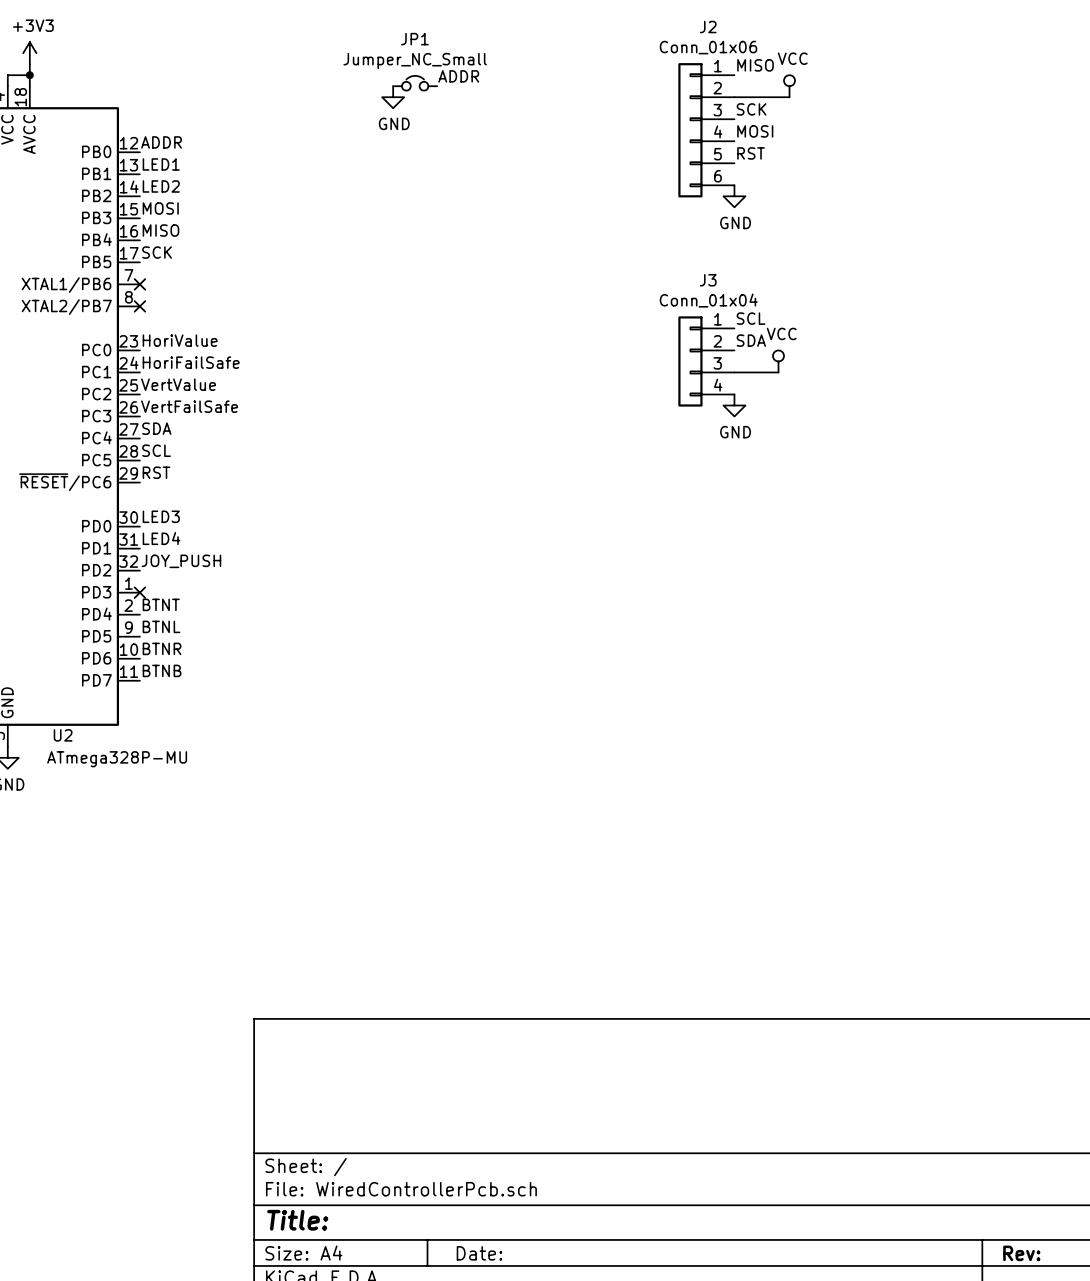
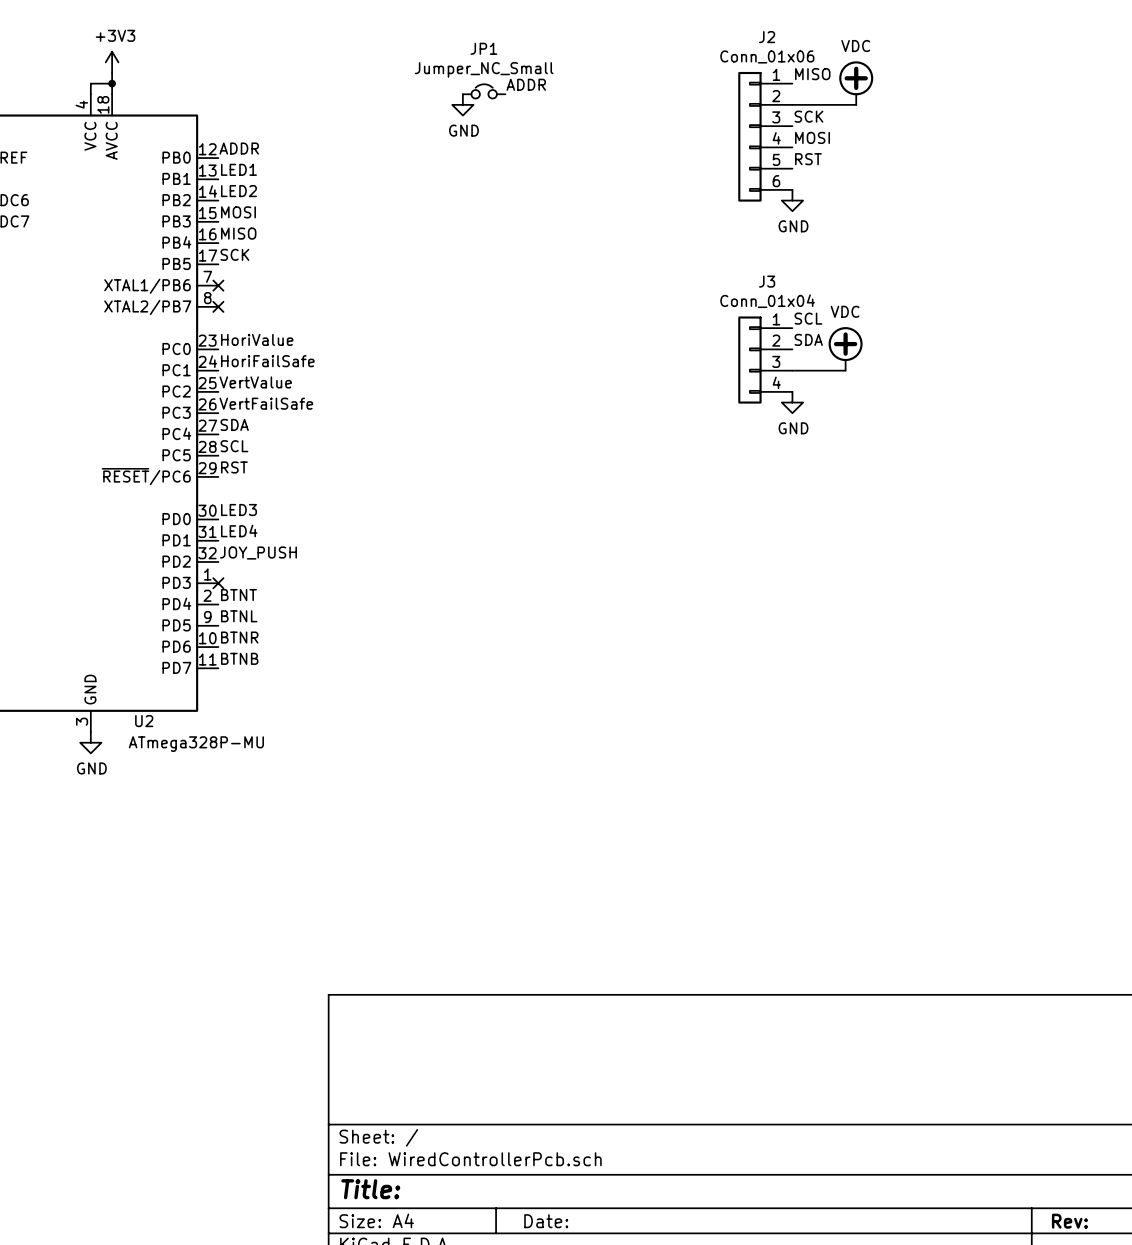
power symbol: none -> VDC (856, 83)
power symbol: VCC (789, 86) -> none
wire: none -> (845, 104) (856, 104)
power symbol: none -> VDC (845, 348)
power symbol: VCC (778, 361) -> none
wire: none -> (834, 370) (845, 370)

